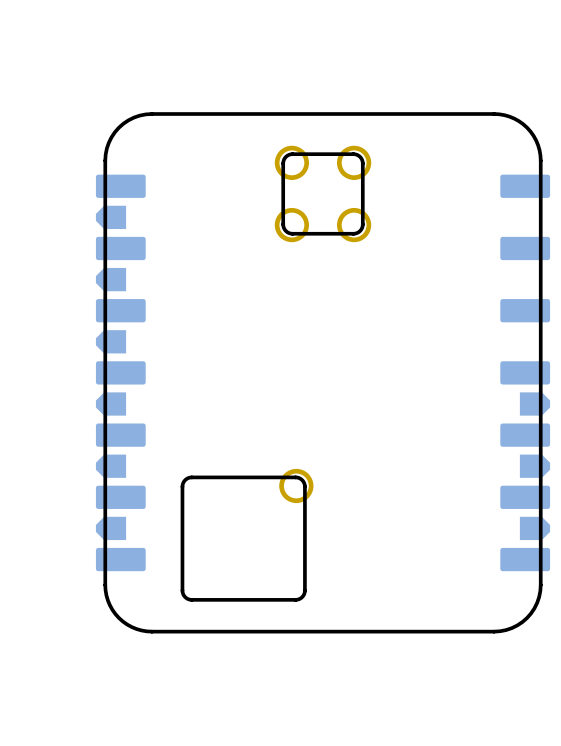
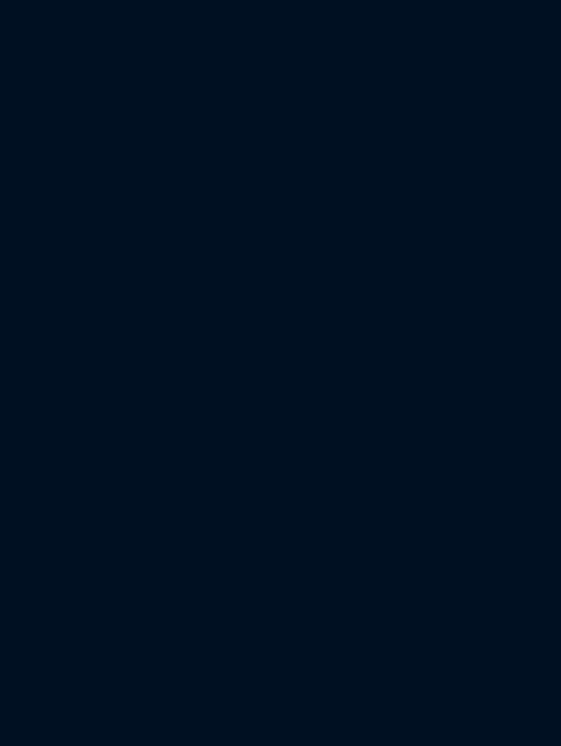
part: (323, 372) -> none

